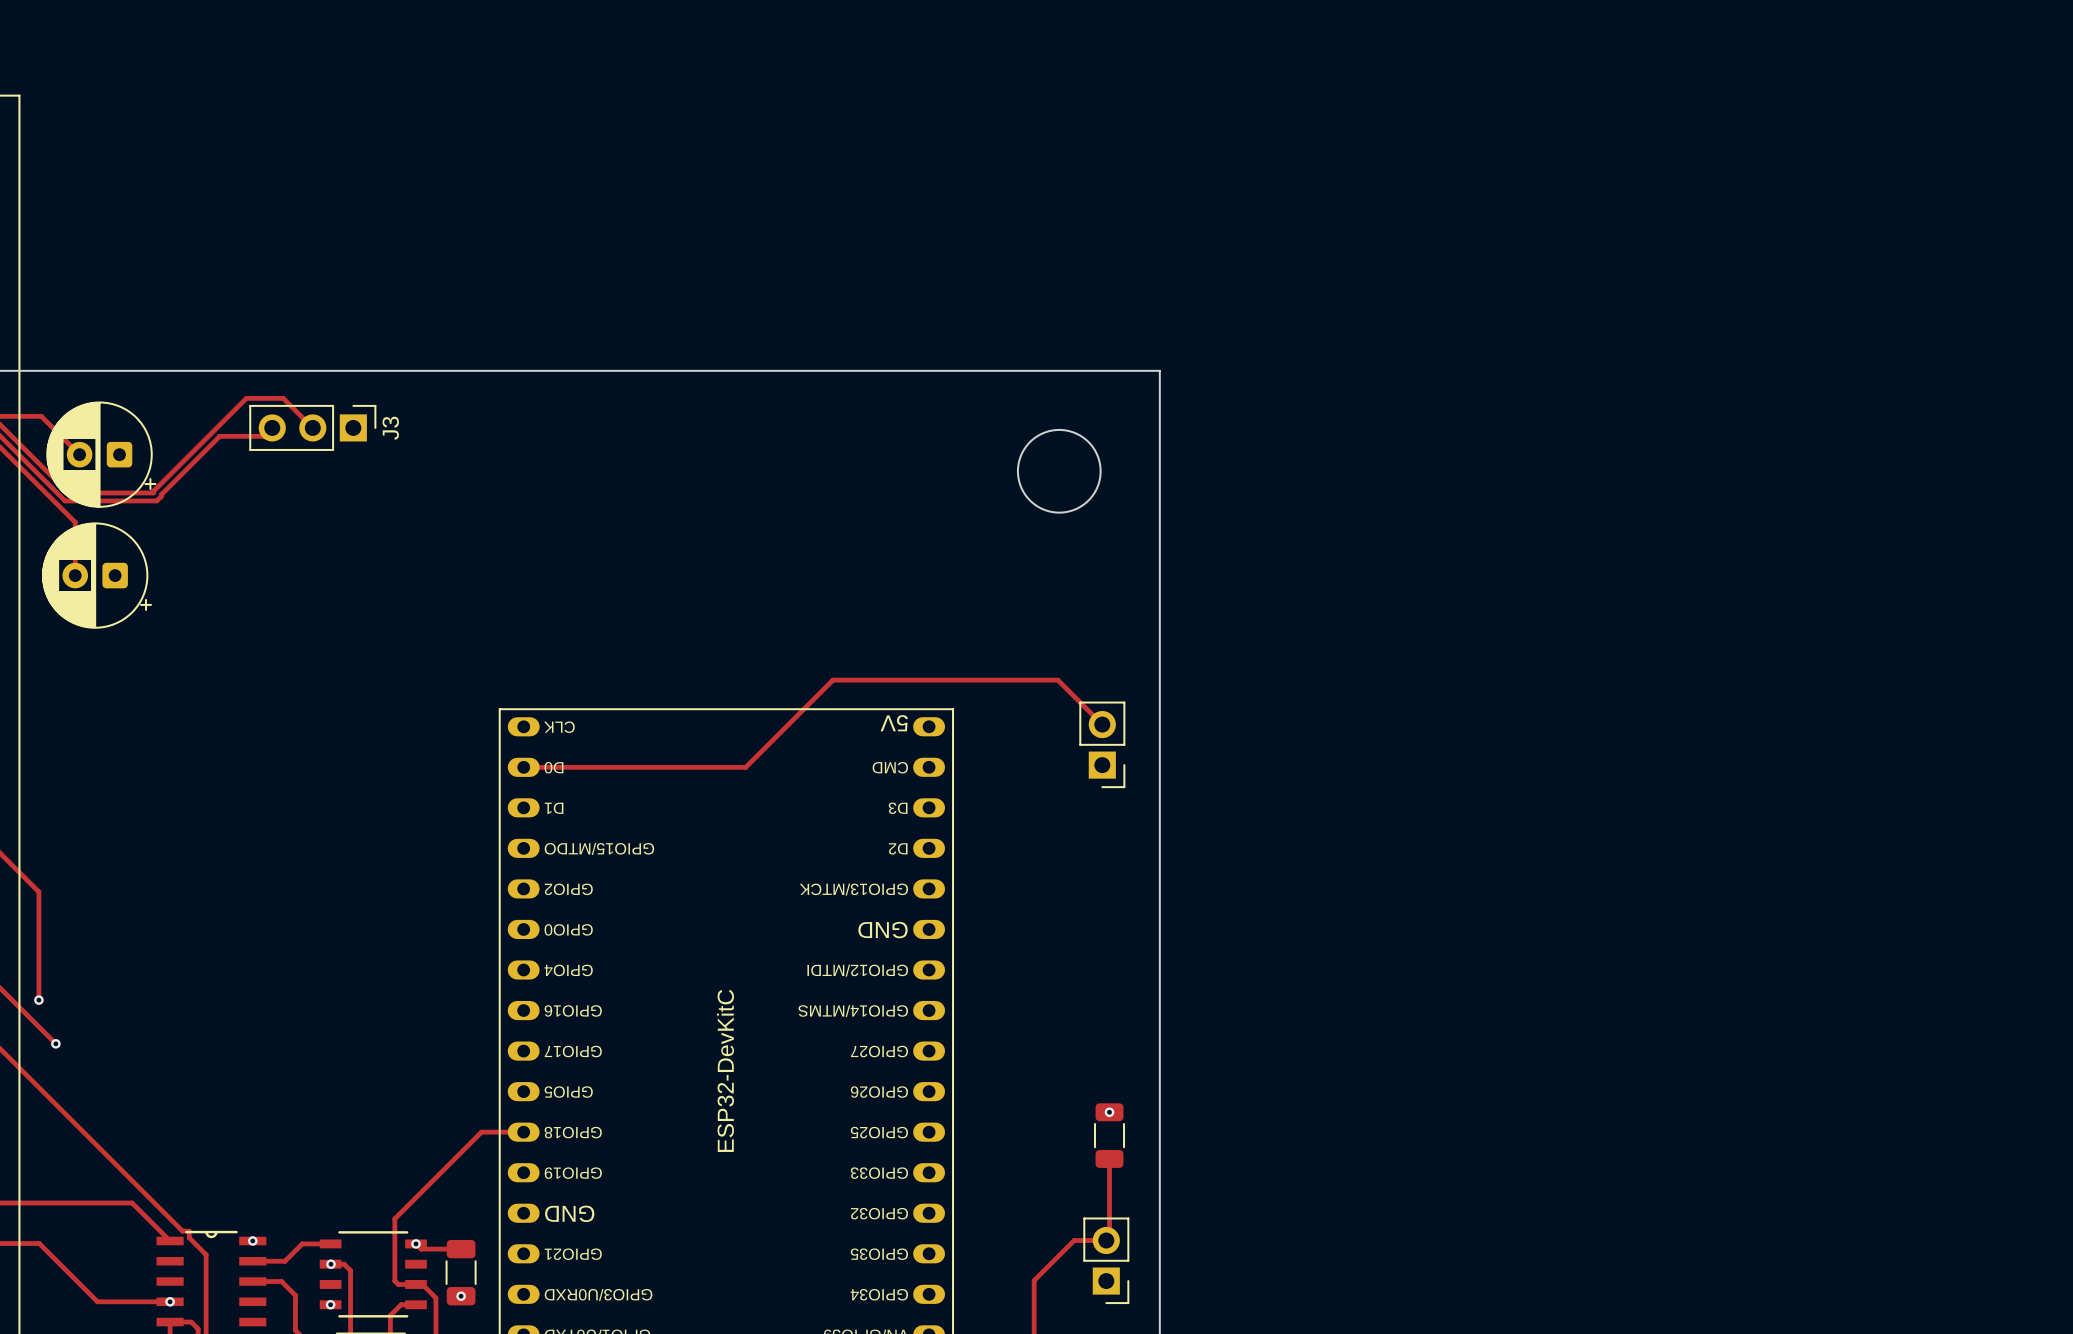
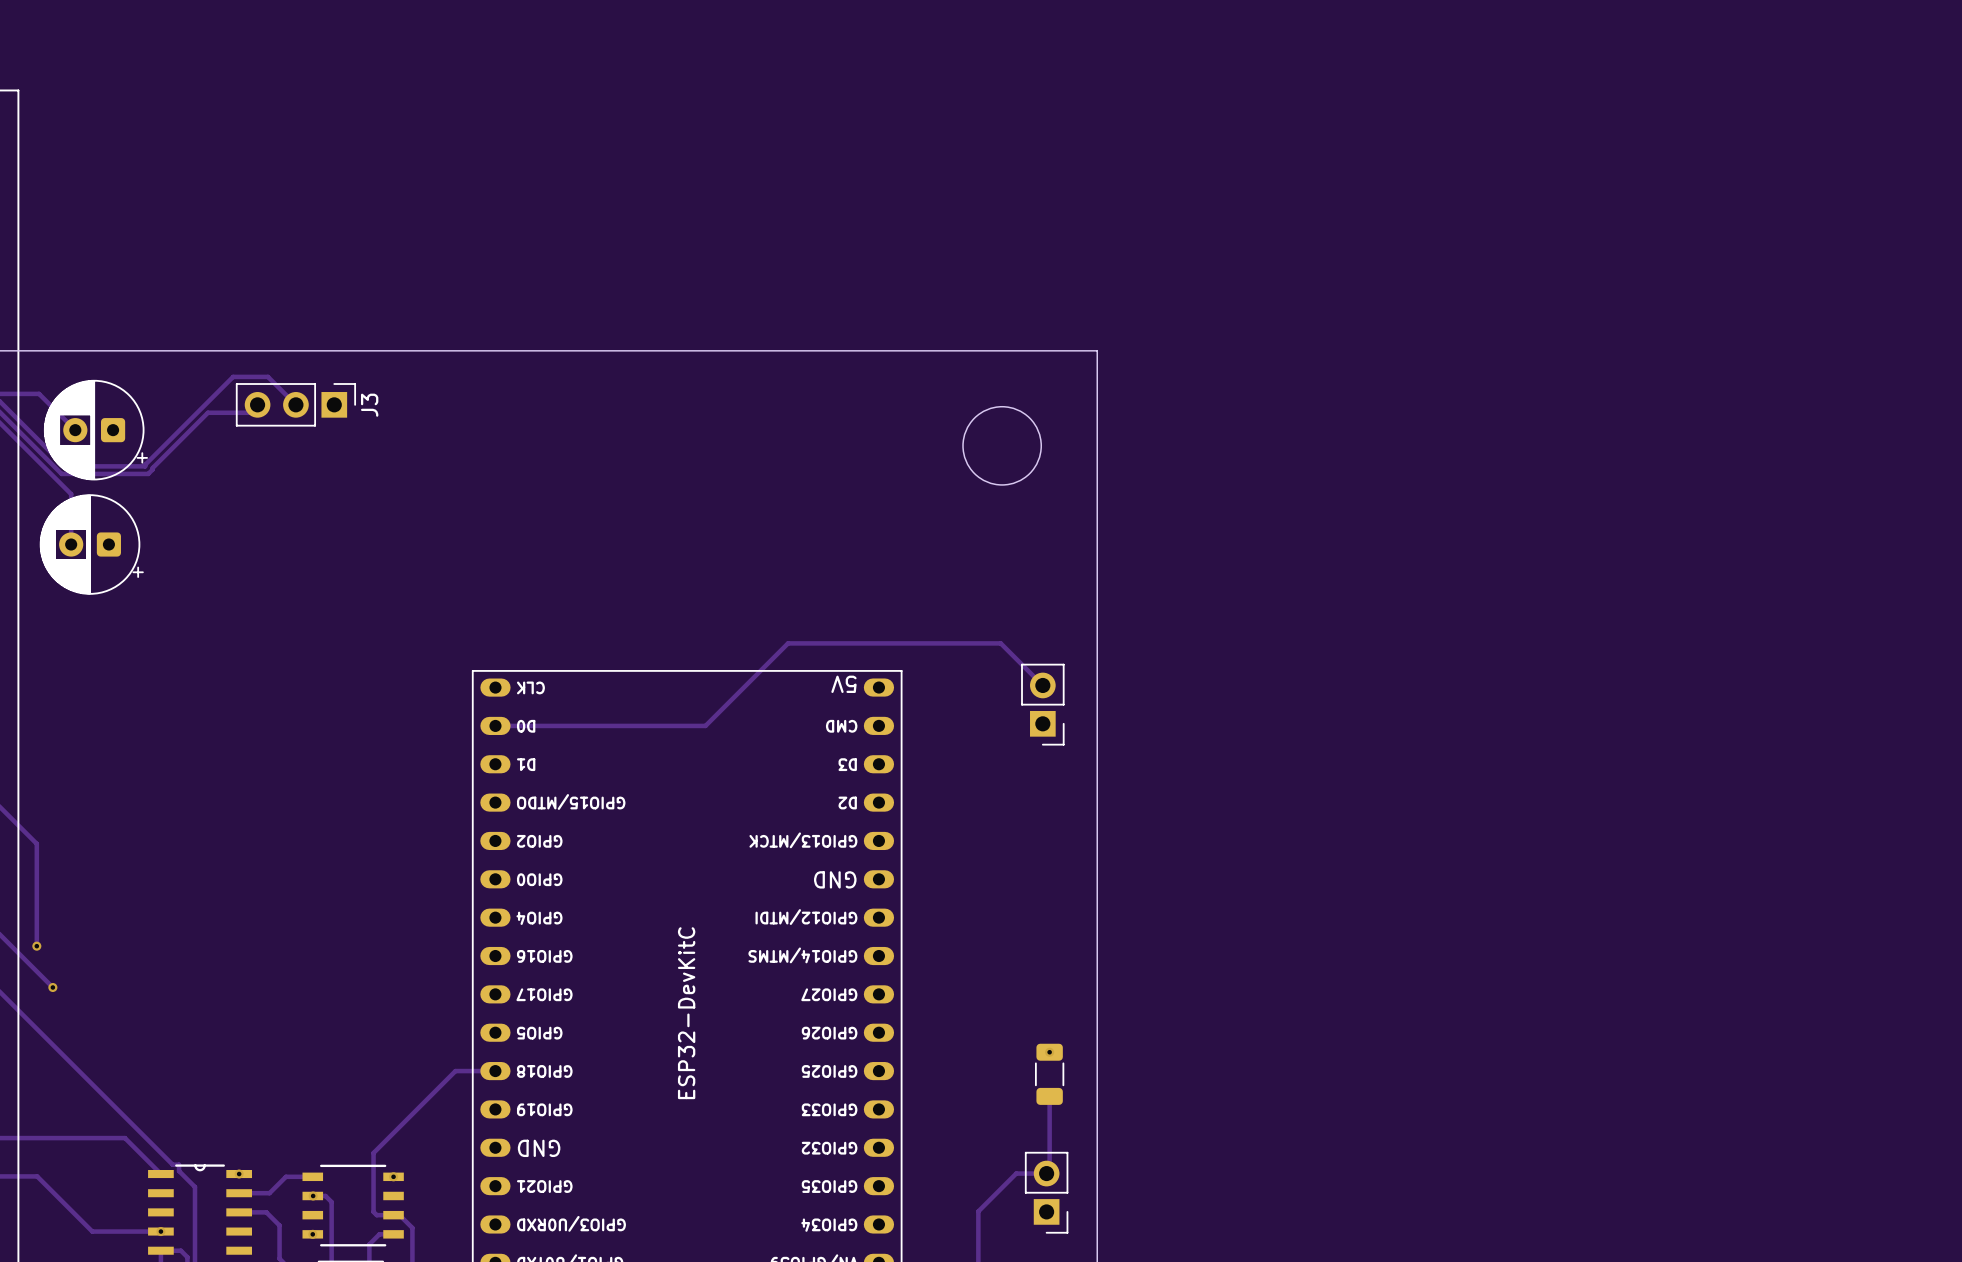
track: (416, 1243) (421, 1249) (461, 1249) -> none
part: (461, 1272) -> none
via: (461, 1296) -> none

